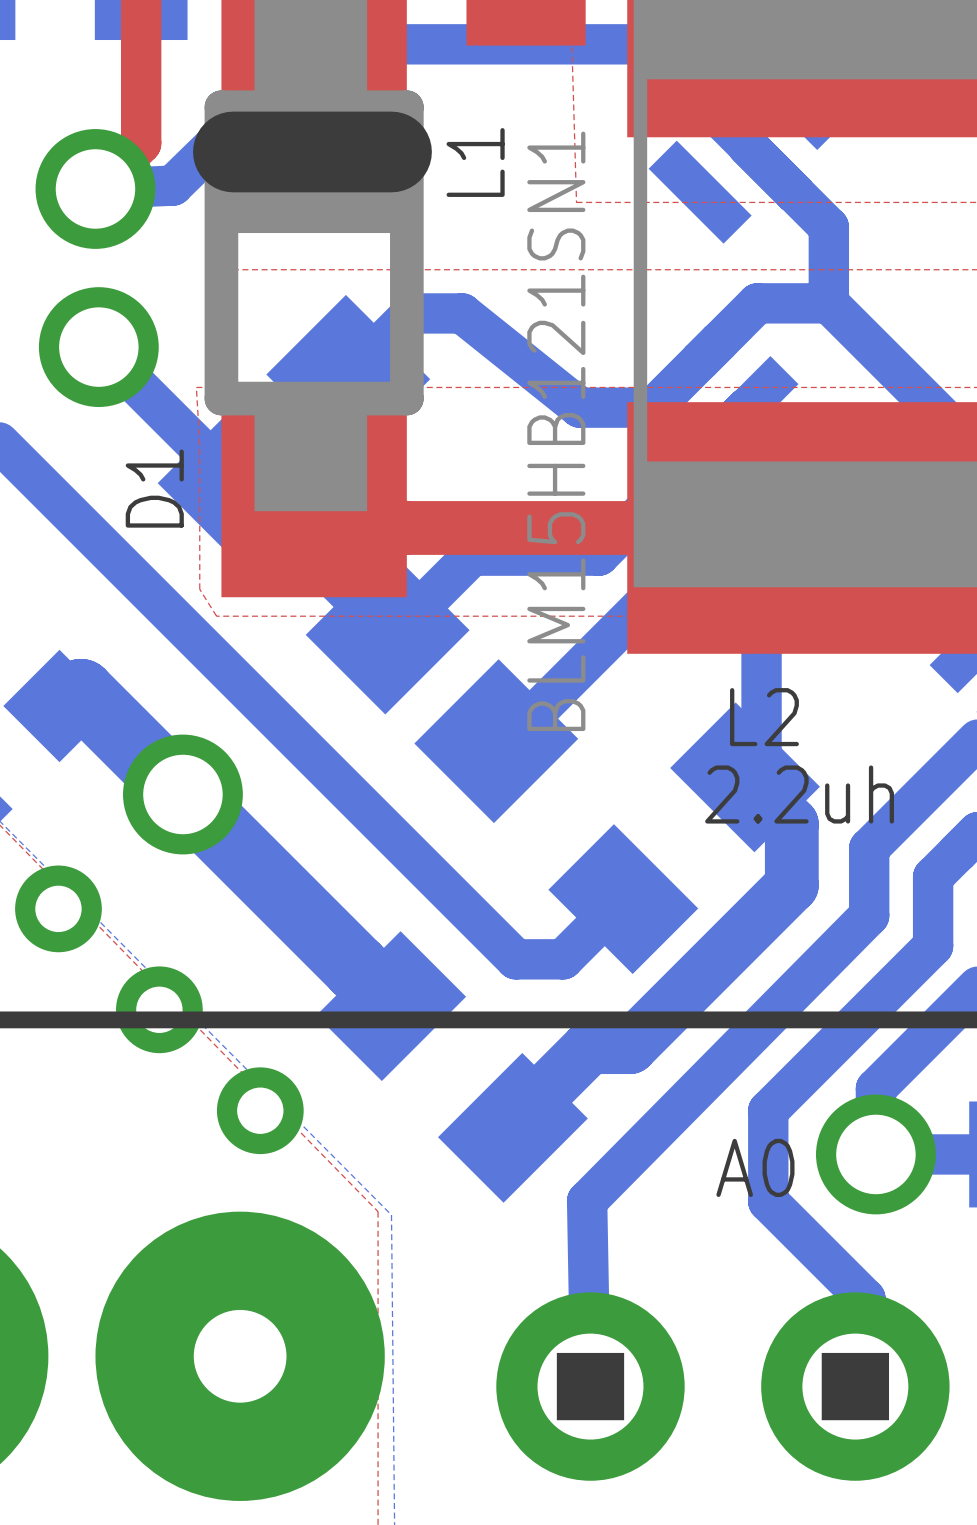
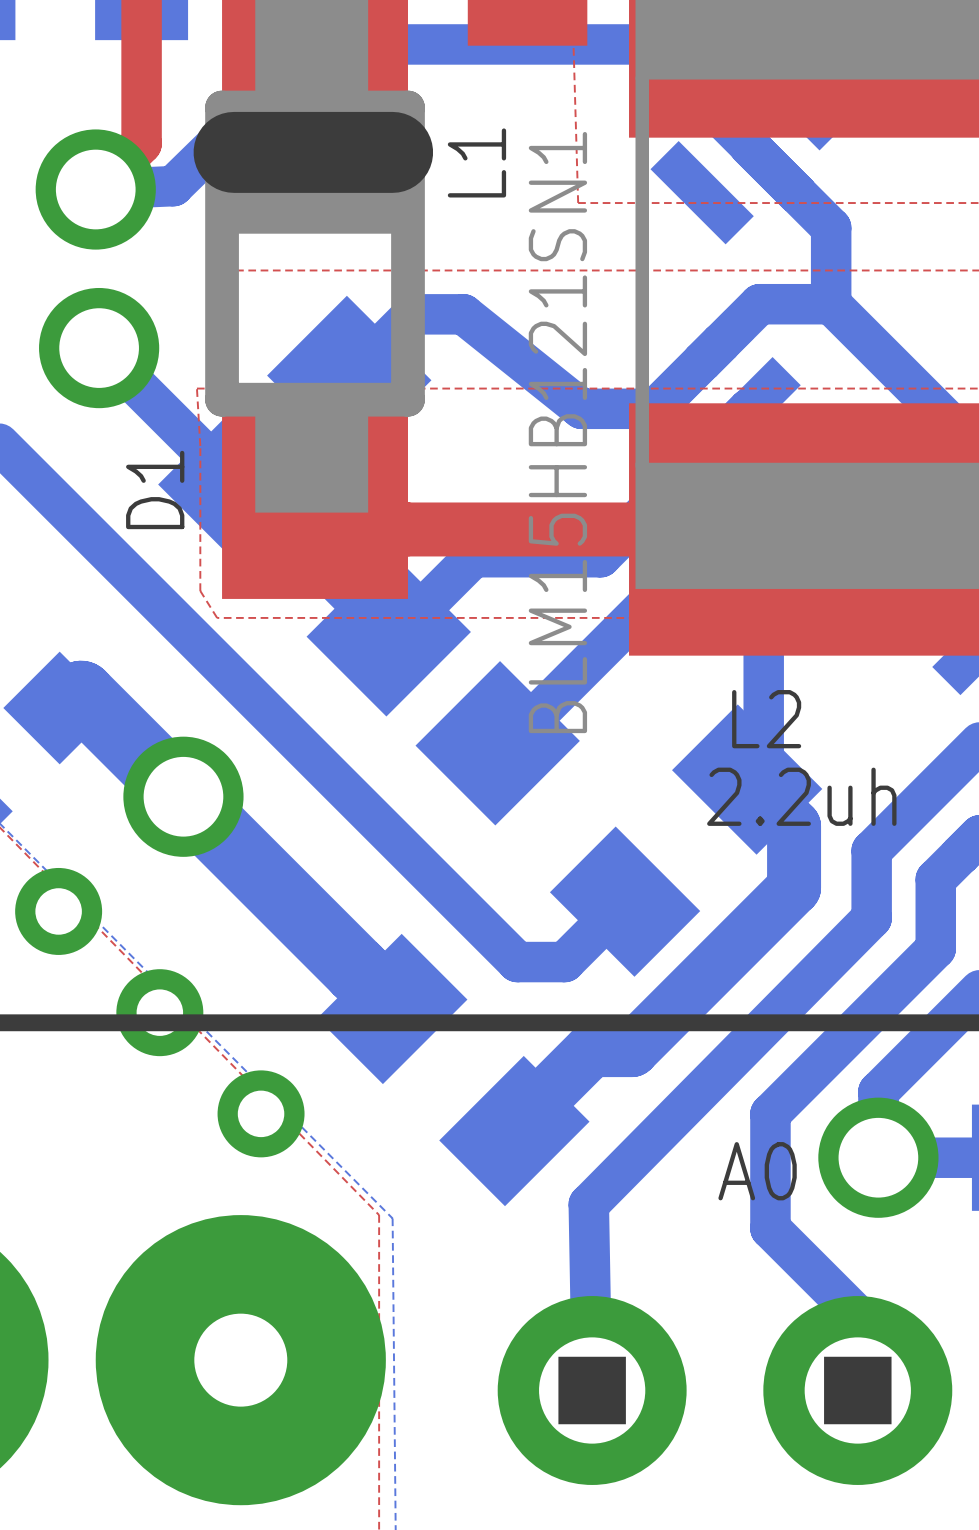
bottom track: (768, 1201) (865, 1298) (855, 1386) -> (770, 1204) (770, 1228) (857, 1315) (857, 1390)

